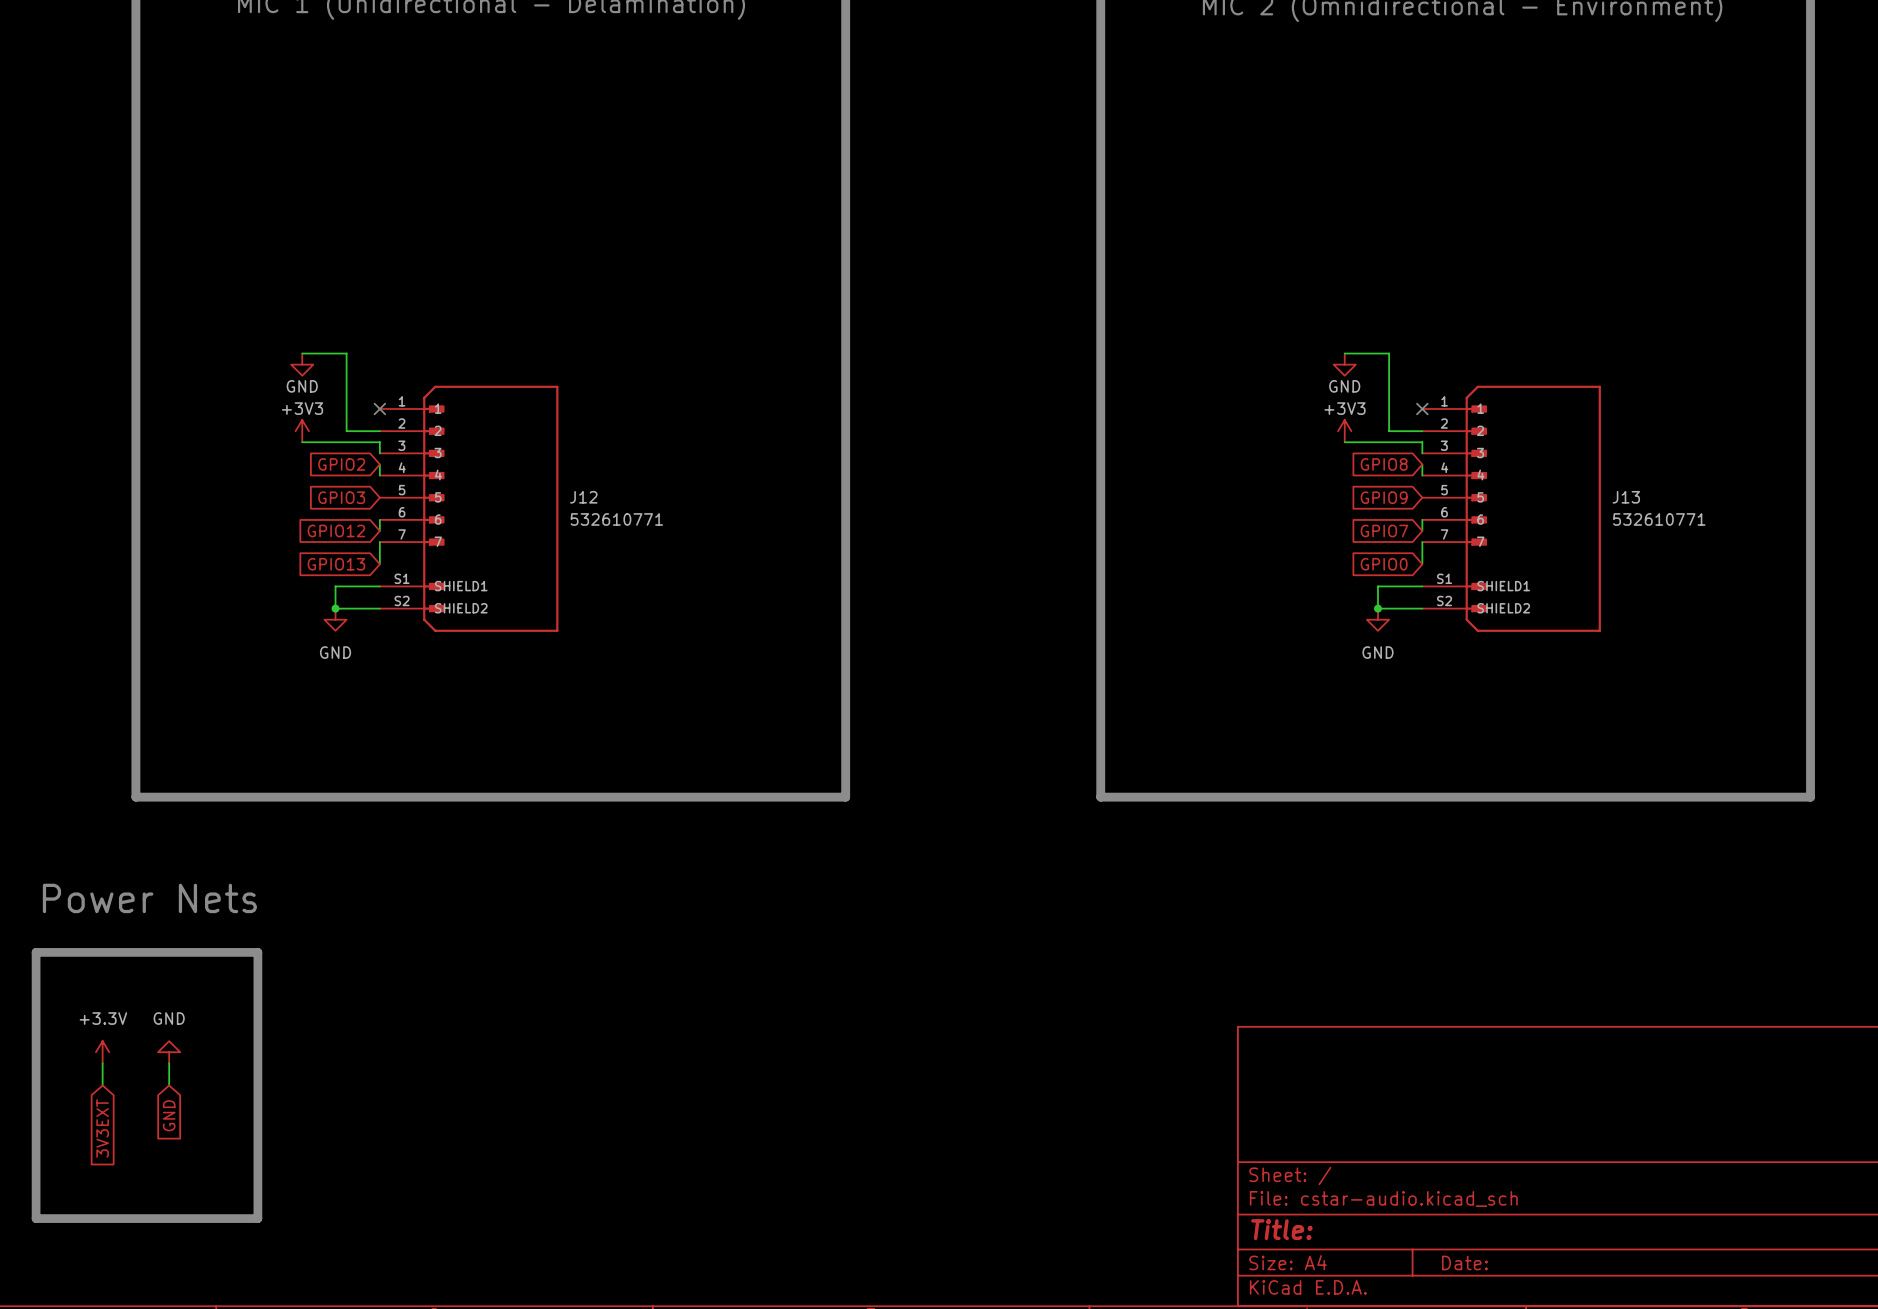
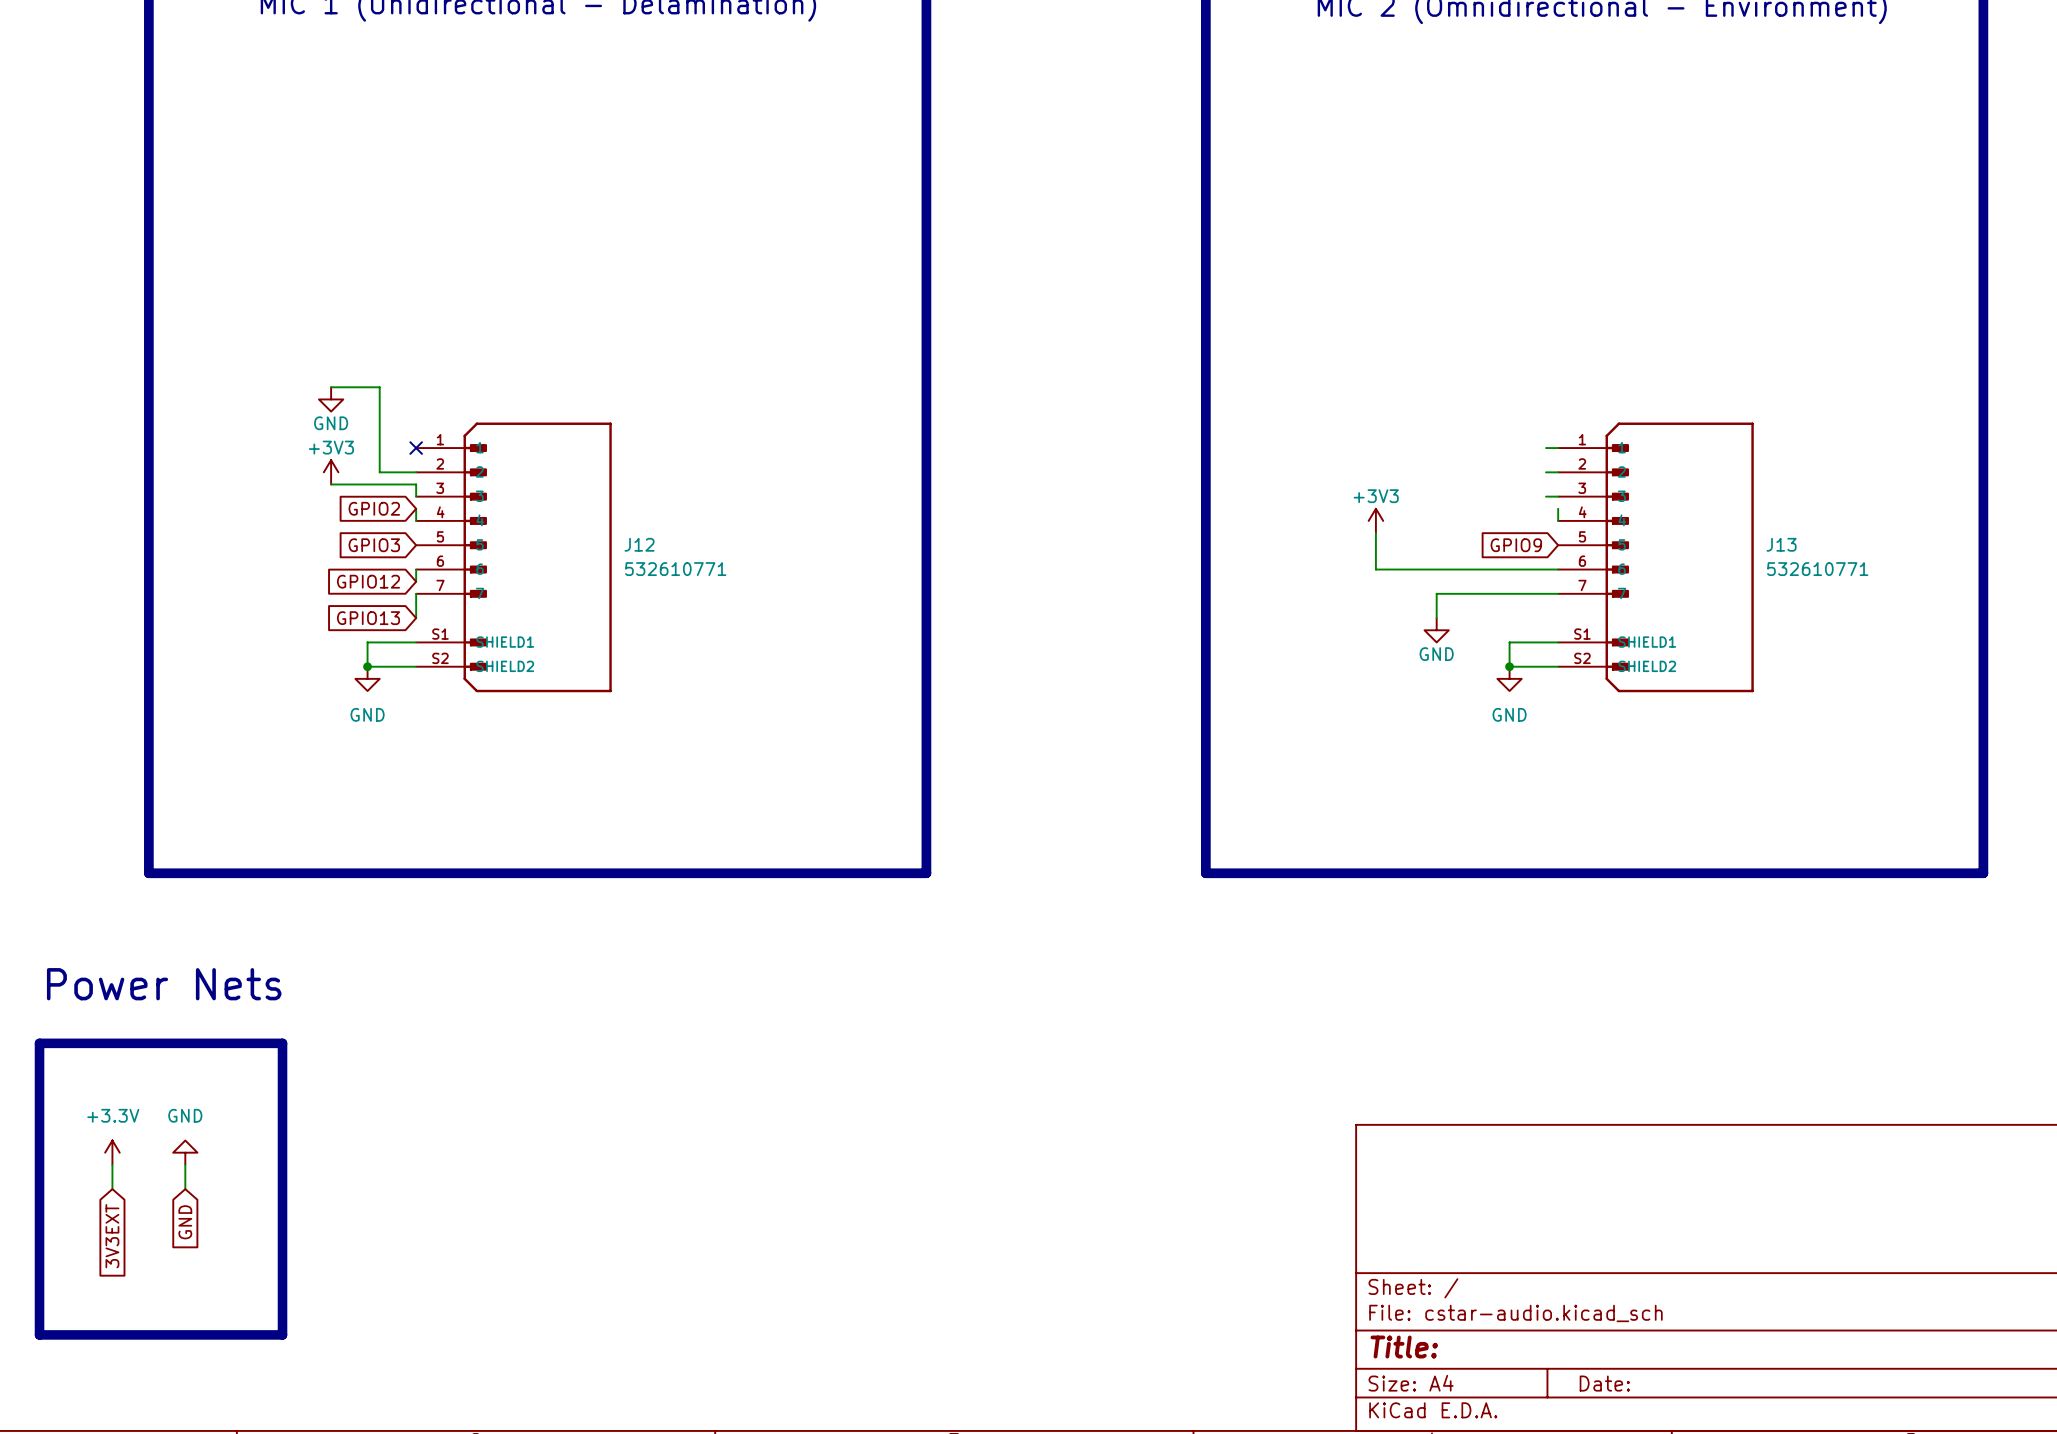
wire: (1344, 353) (1389, 353) (1389, 431) (1411, 431) -> none
power symbol position: GND (1344, 364) -> GND (1436, 630)
wire: none -> (1546, 448) (1558, 448)
no-connect mark: (1422, 408) -> none
power symbol position: +3V3 (1344, 431) -> +3V3 (1375, 520)
wire: (1344, 442) (1422, 442) (1422, 453) -> (1546, 496) (1558, 496)
global label: GPIO8 (1384, 464) -> none
wire: (1422, 519) (1422, 530) -> (1558, 569) (1375, 569) (1375, 533)
global label: GPIO7 (1384, 530) -> none
wire: (1422, 542) (1422, 564) -> (1558, 593) (1436, 593) (1436, 618)
global label: GPIO0 (1384, 564) -> none

